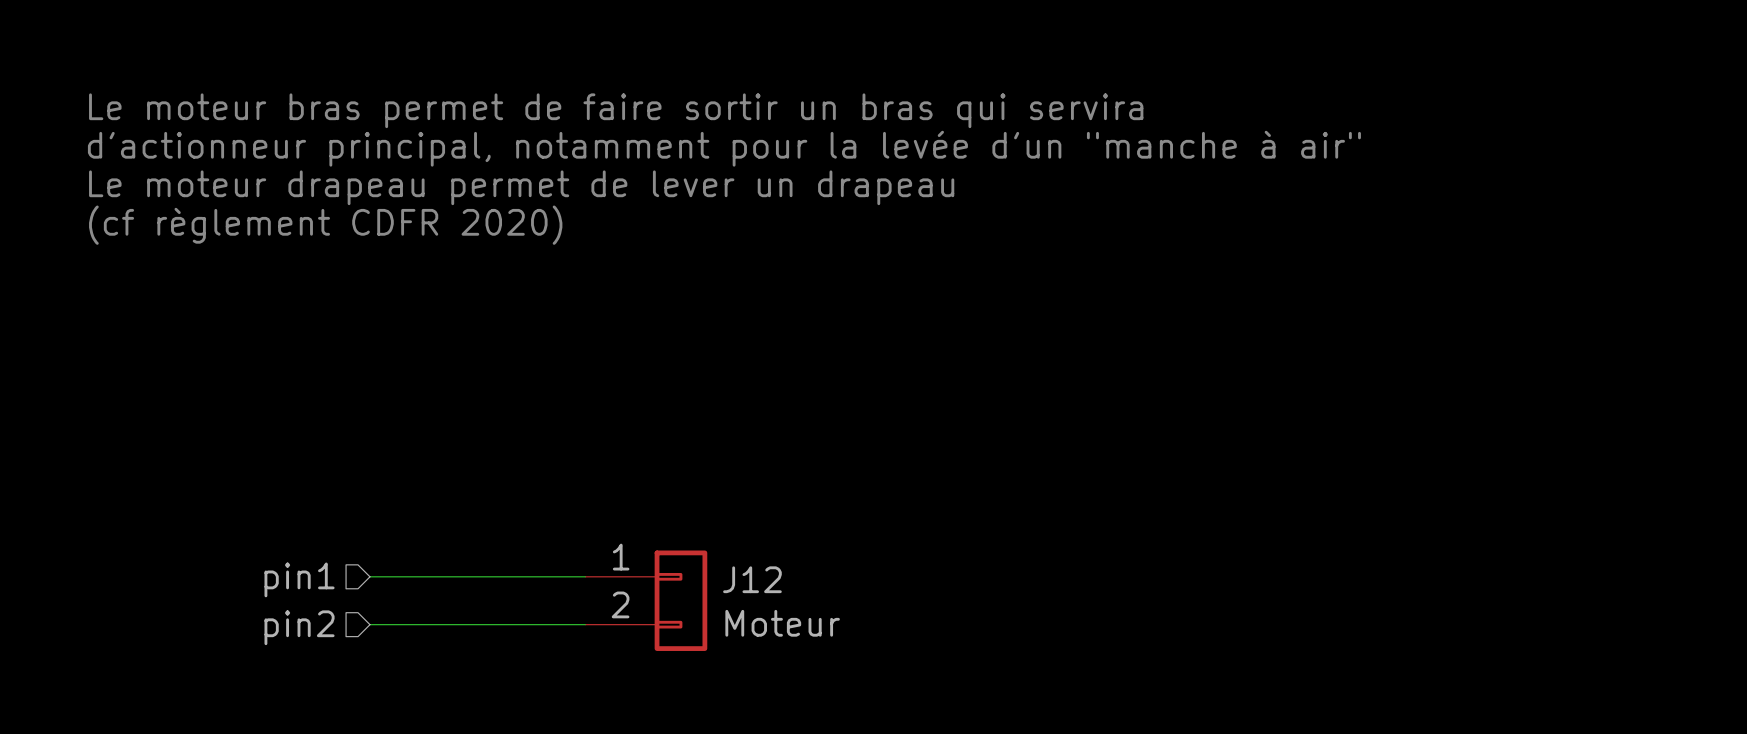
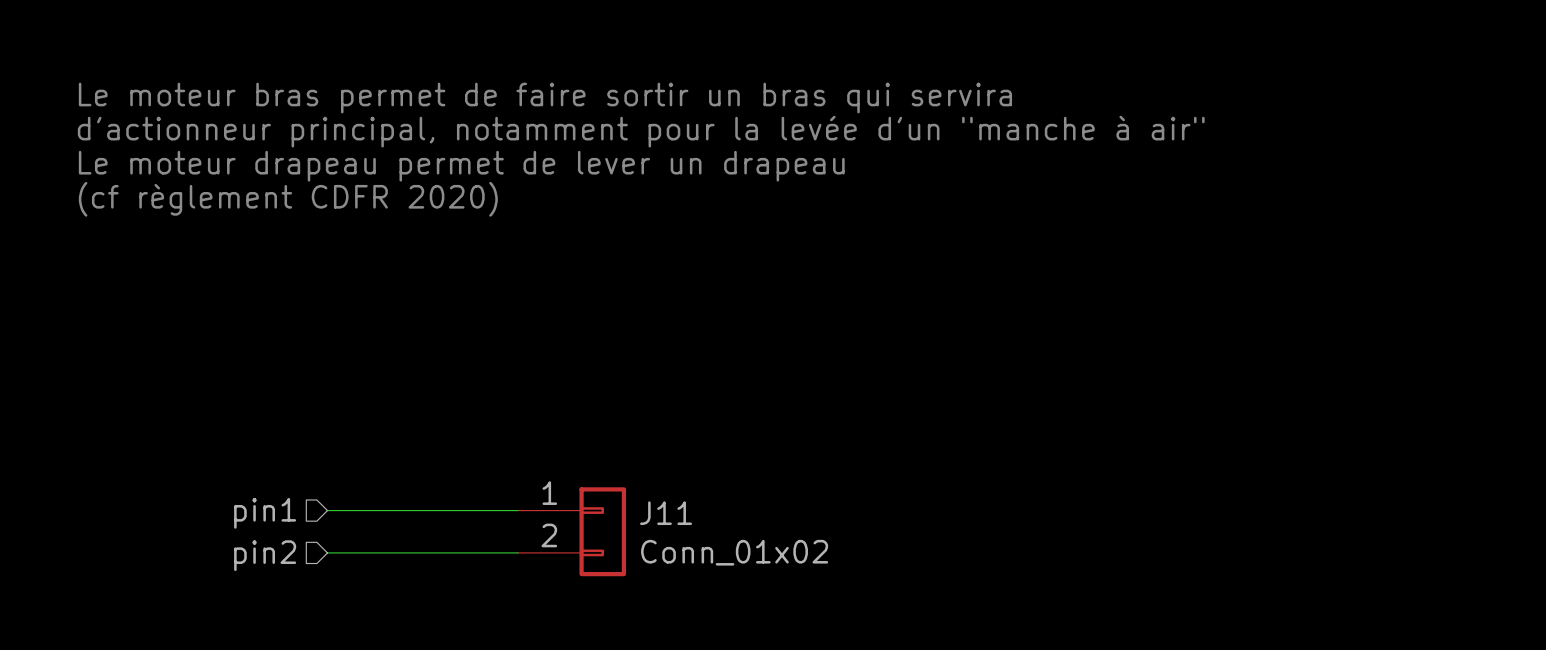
J12 name: J12 (752, 579) -> J11 (666, 513)
J12 value: Moteur (782, 623) -> Conn_01x02 (734, 552)

